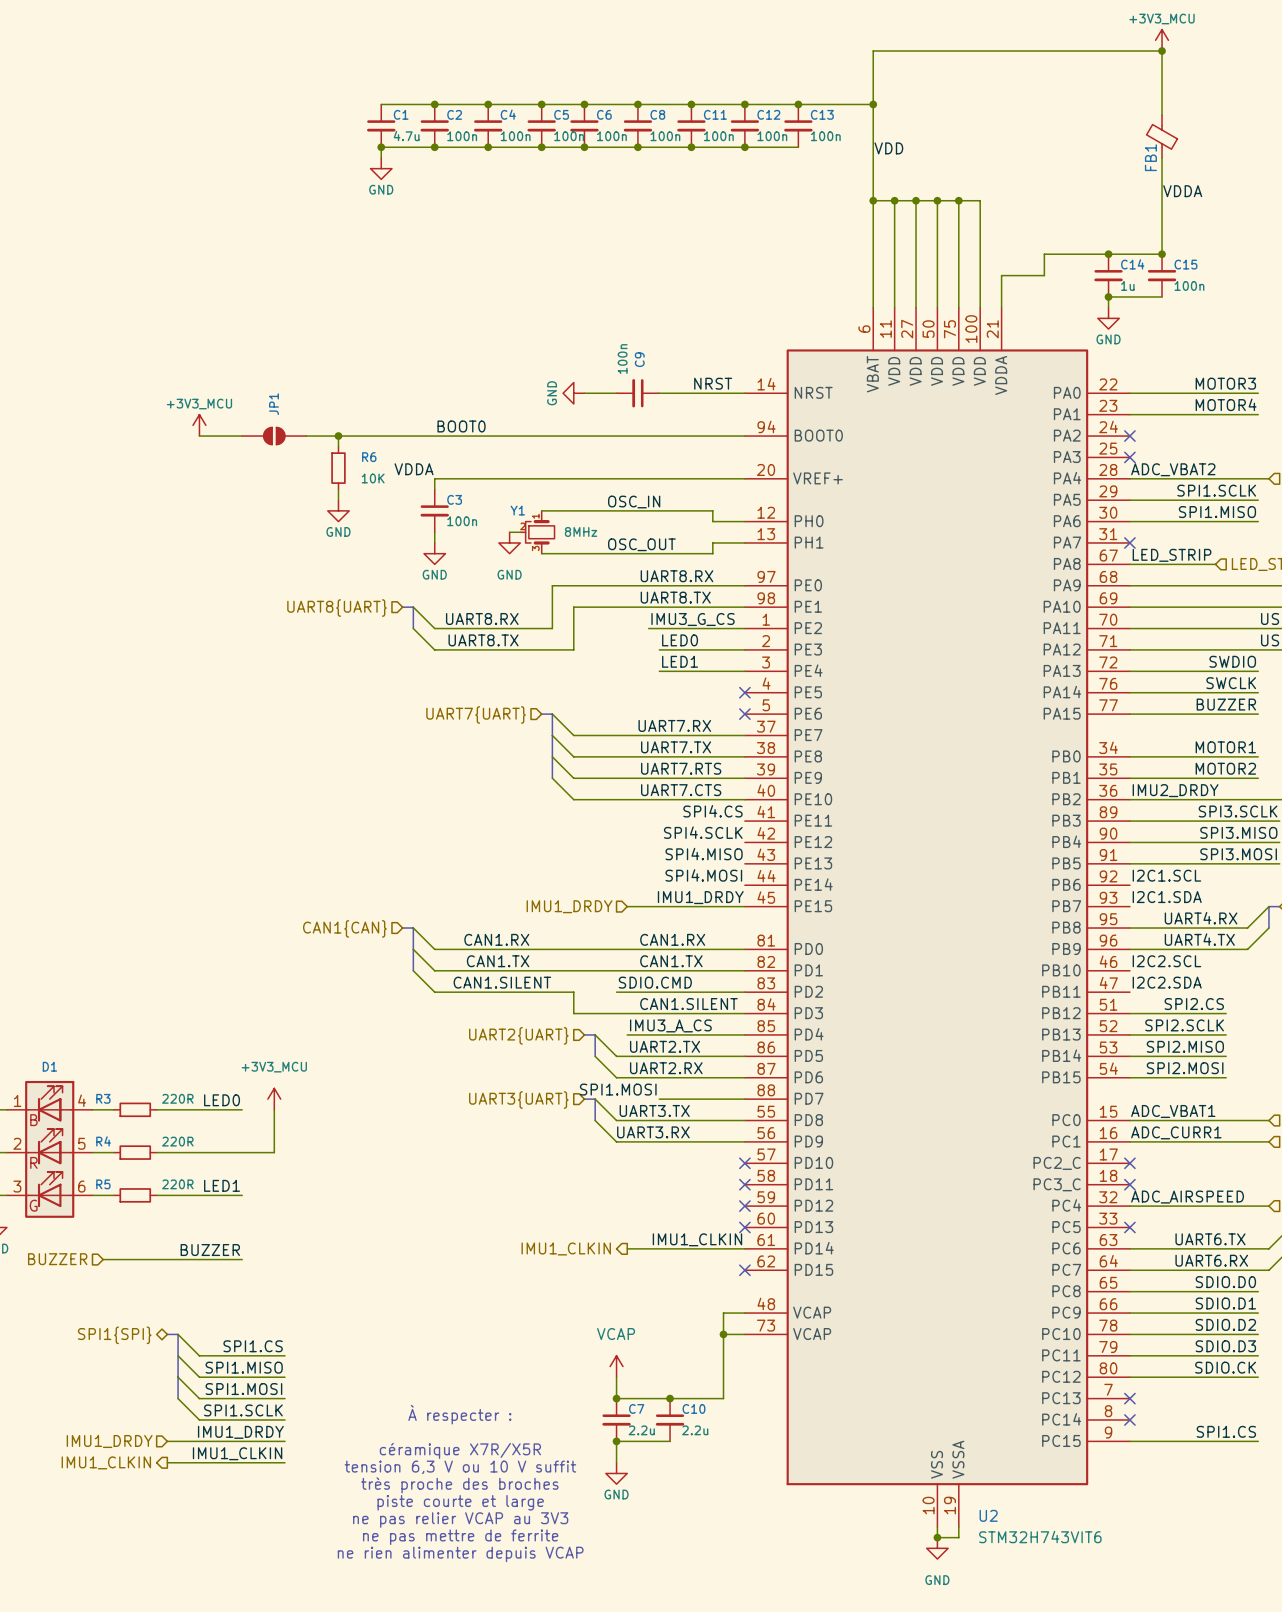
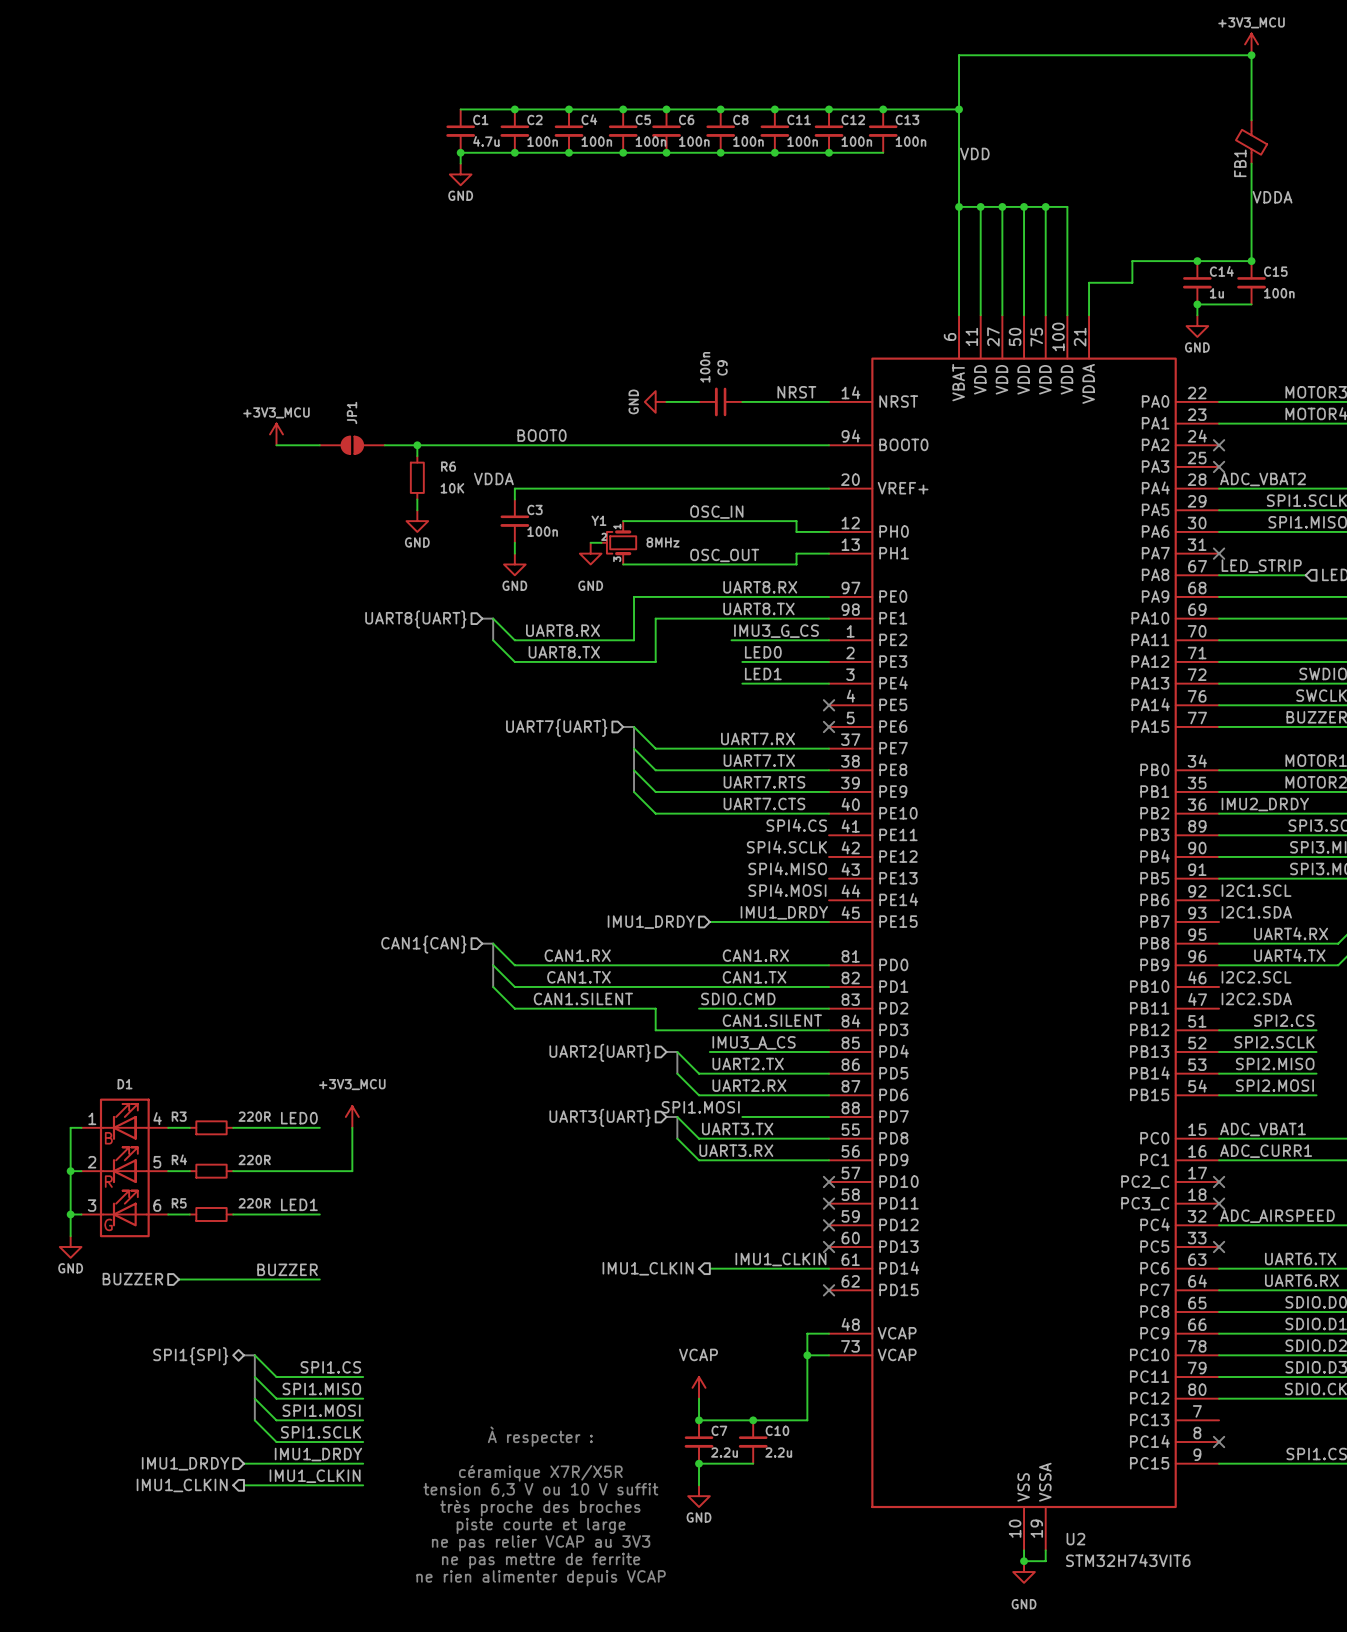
no-connect mark: (1129, 1398) -> none

